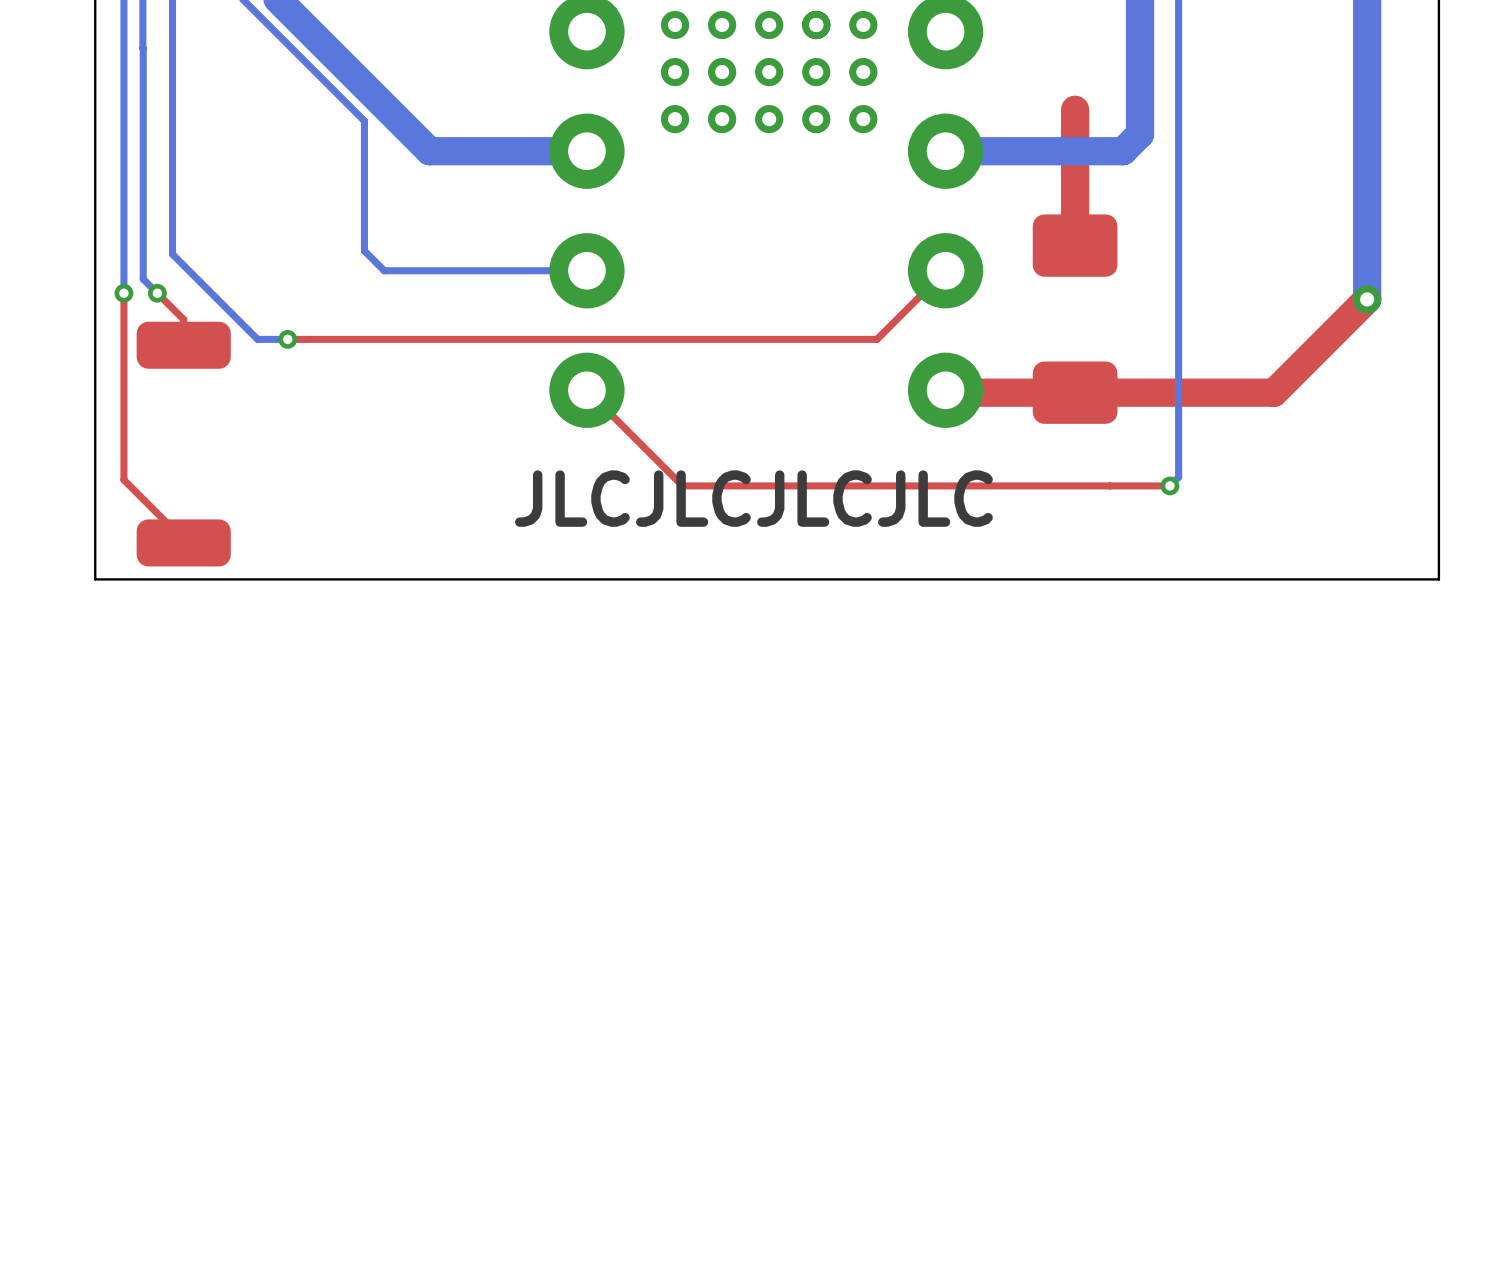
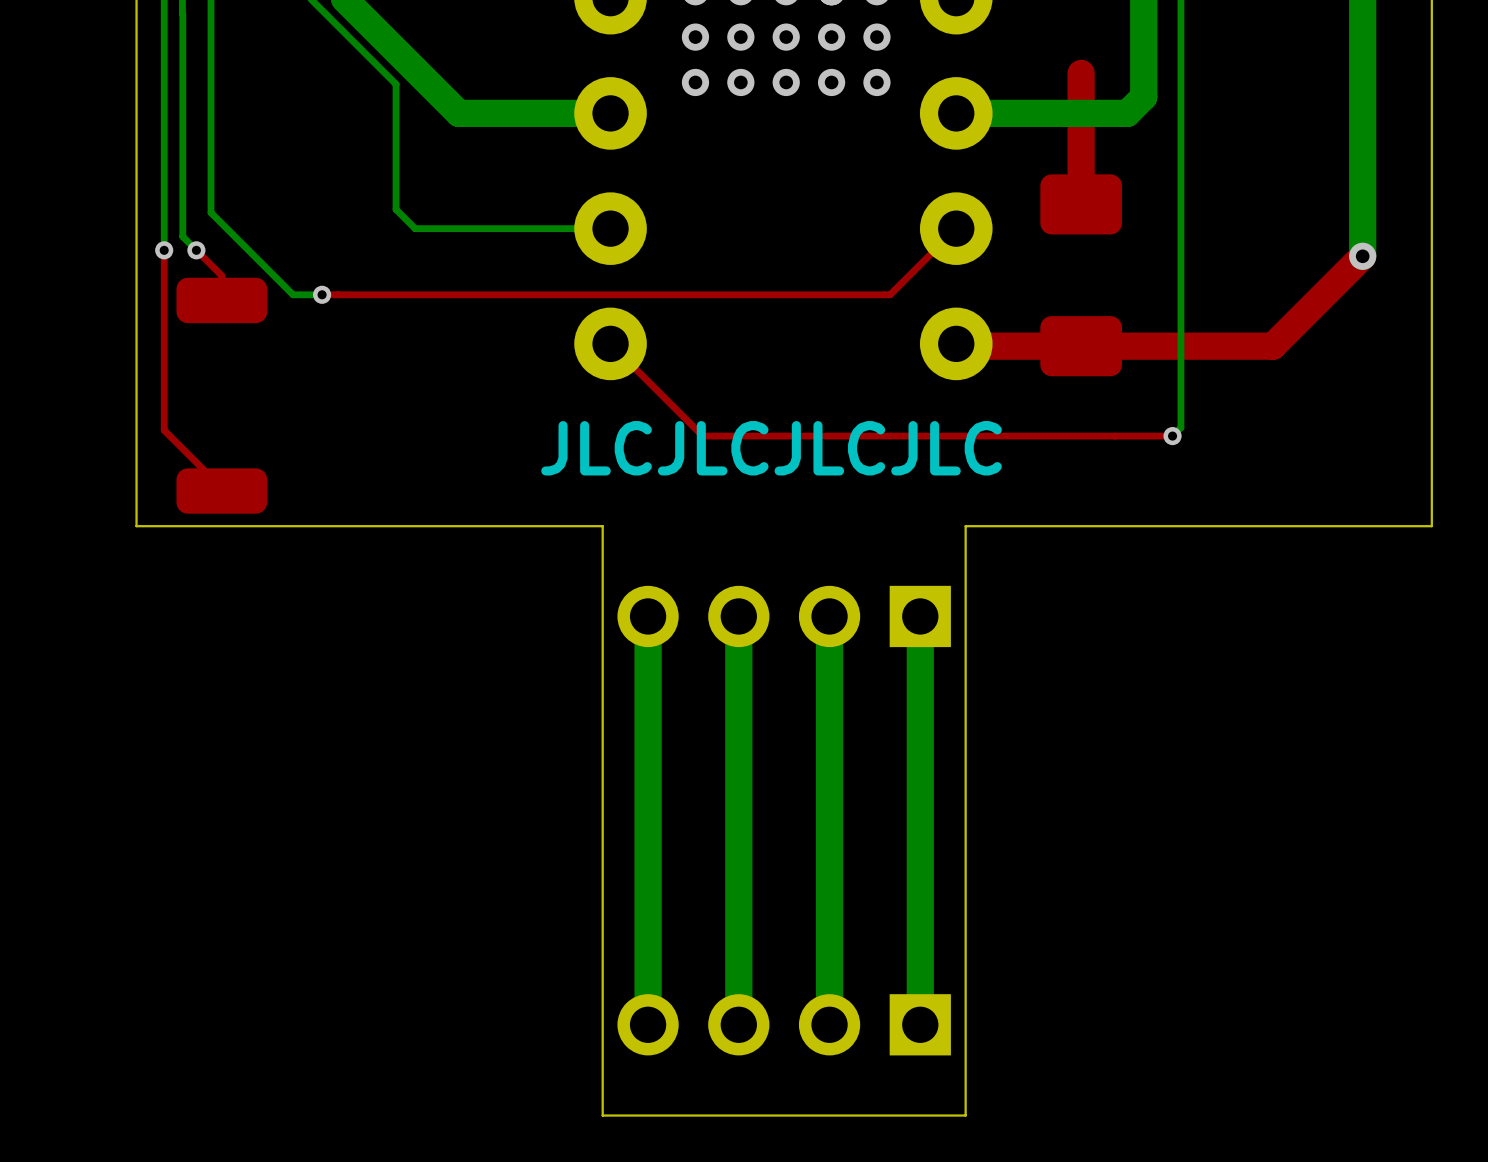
board edge: (955, 579) (578, 579) -> (965, 526) (965, 1115) (602, 1115) (602, 526)
bottom track: none -> (648, 616) (648, 1024)
bottom track: none -> (738, 616) (738, 1024)
part: none -> (784, 616)
bottom track: none -> (829, 616) (829, 1024)
bottom track: none -> (920, 616) (920, 1024)
part: none -> (784, 1024)

